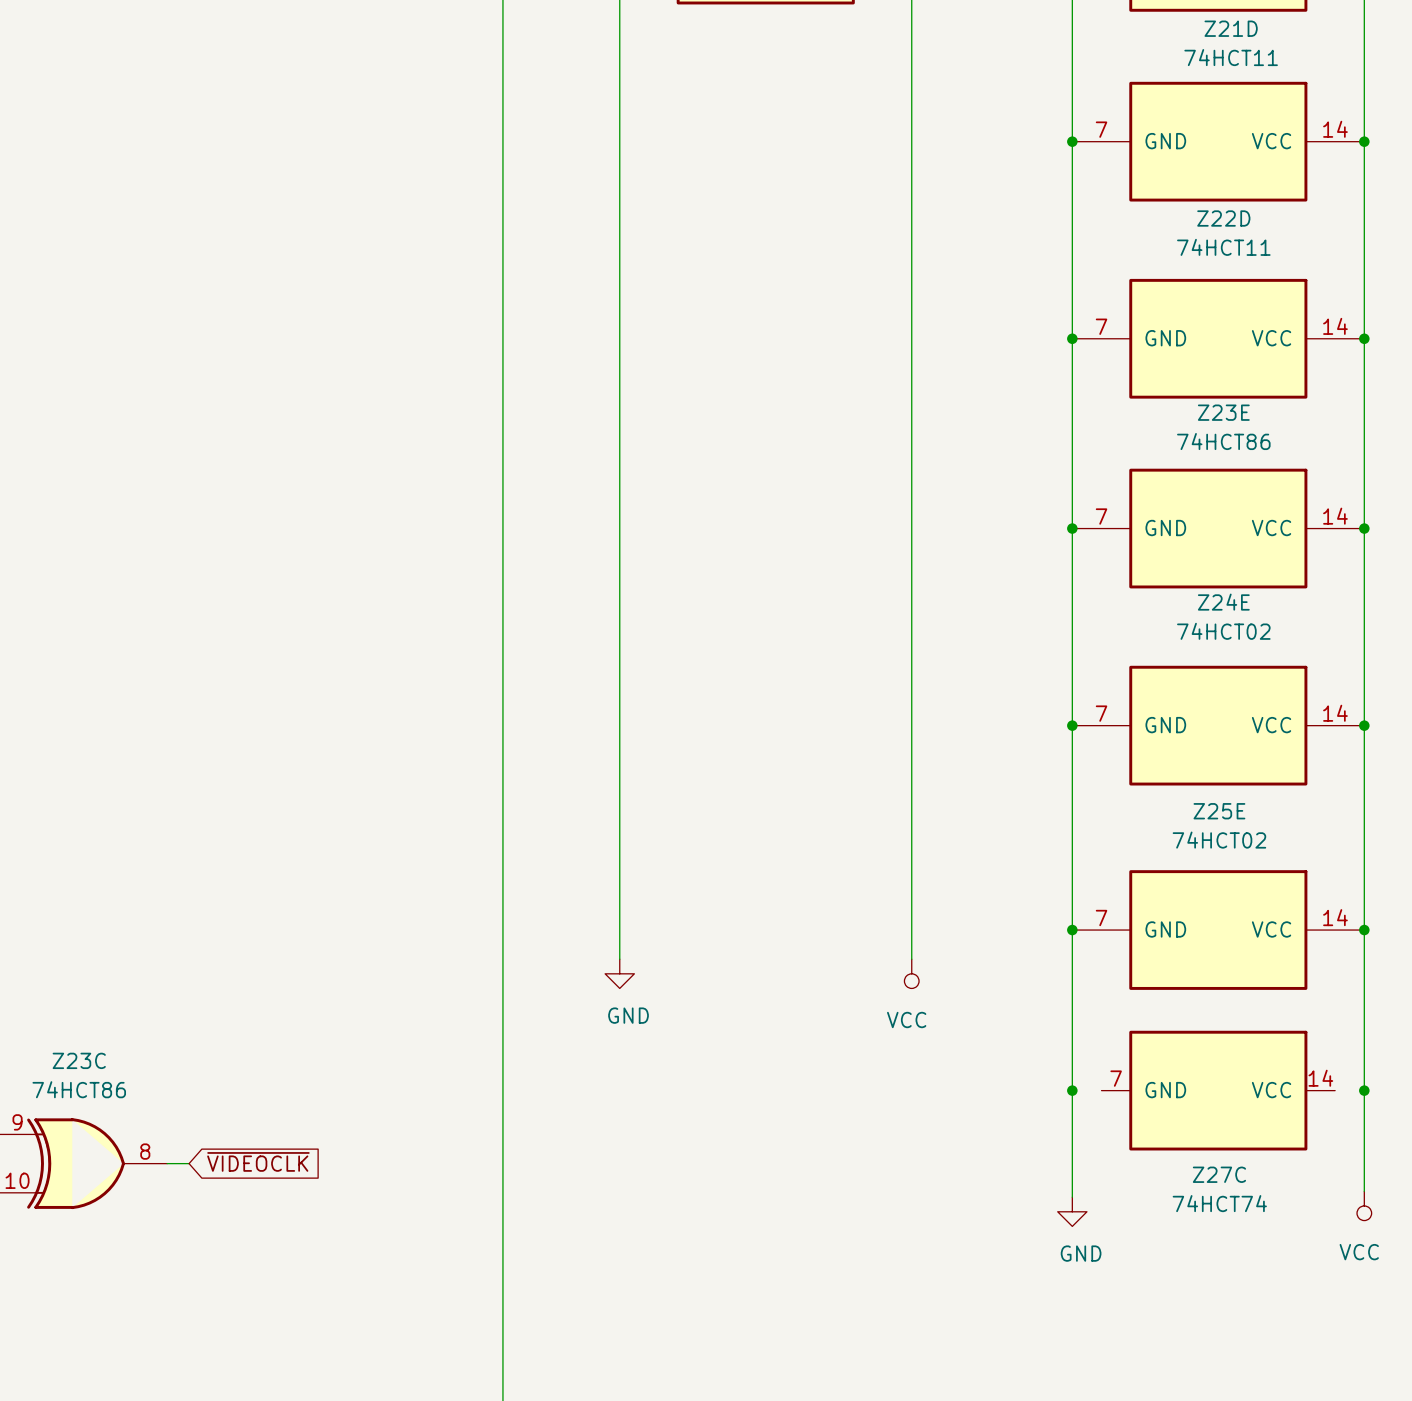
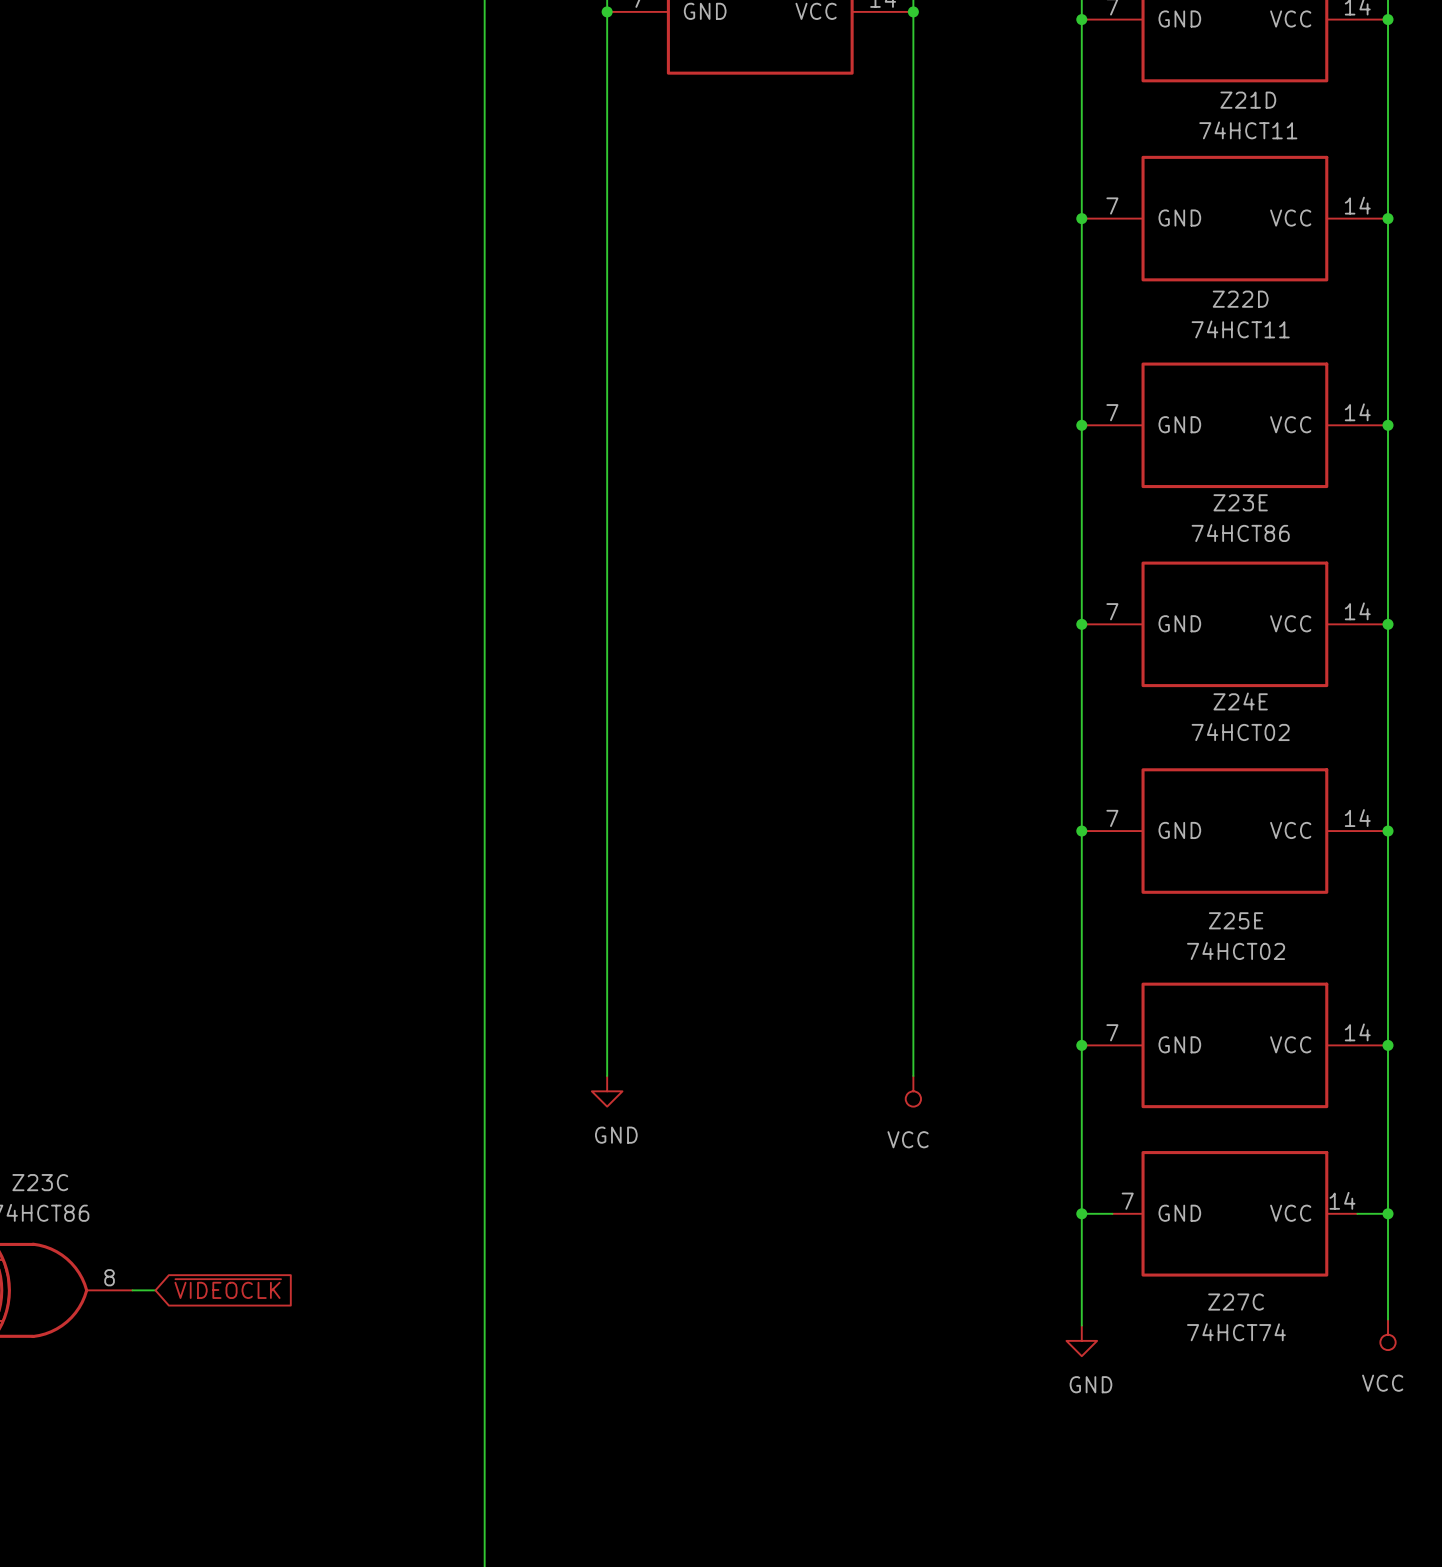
wire: none -> (1081, 1213) (1112, 1213)
wire: none -> (1357, 1213) (1388, 1213)

